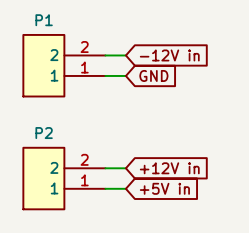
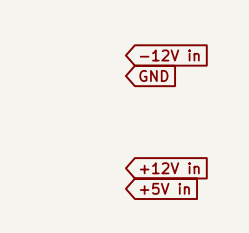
wire: (105, 55) (125, 55) -> none
P1: (64, 65) -> none
wire: (105, 75) (125, 75) -> none
wire: (105, 168) (125, 168) -> none
P2: (64, 178) -> none
wire: (105, 188) (125, 188) -> none

